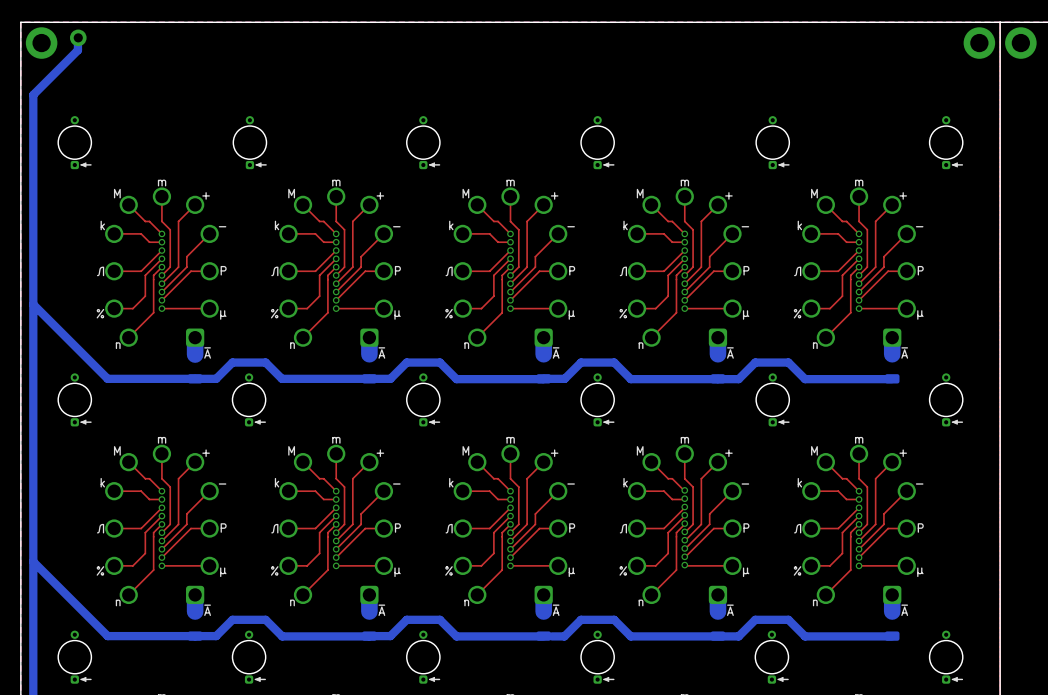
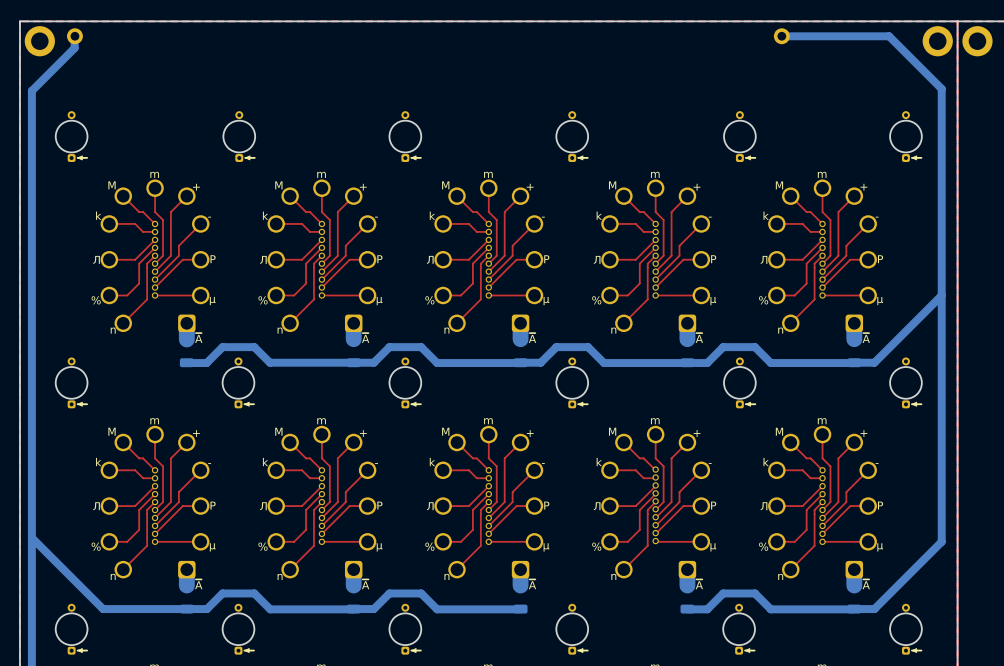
bottom track: none -> (781, 36) (889, 36) (941, 88) (941, 541) (874, 609) (854, 609)
part: none -> (781, 36)
bottom track: (33, 304) (107, 378) (216, 378) -> (186, 363) (207, 362)
bottom track: none -> (941, 295) (874, 362) (854, 362)
bottom track: (551, 636) (564, 636) (581, 619) (614, 619) (630, 636) (718, 636) -> none

